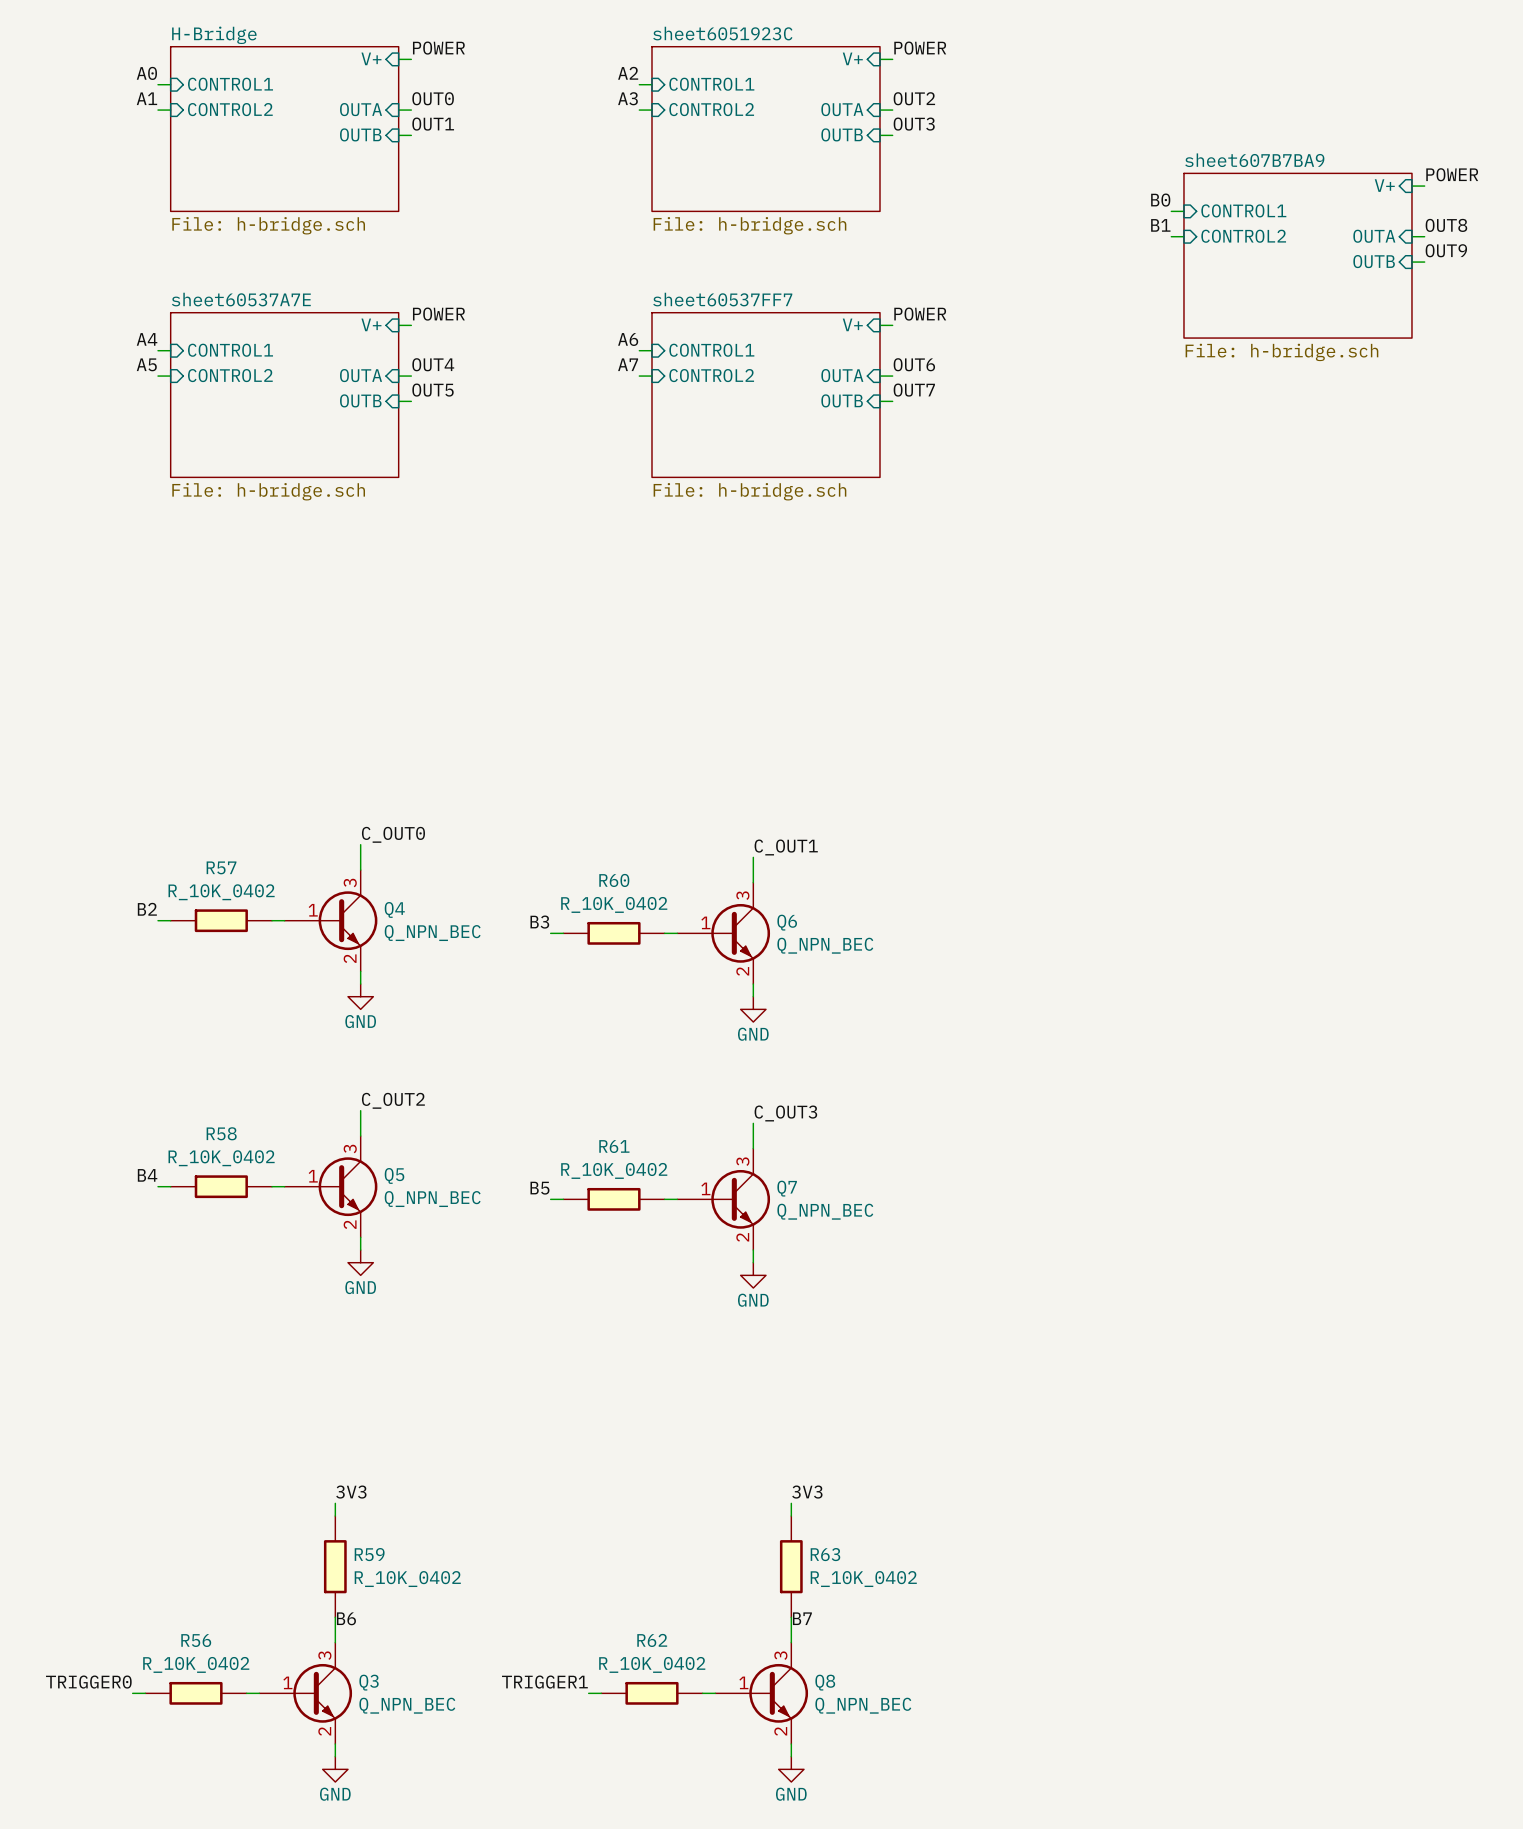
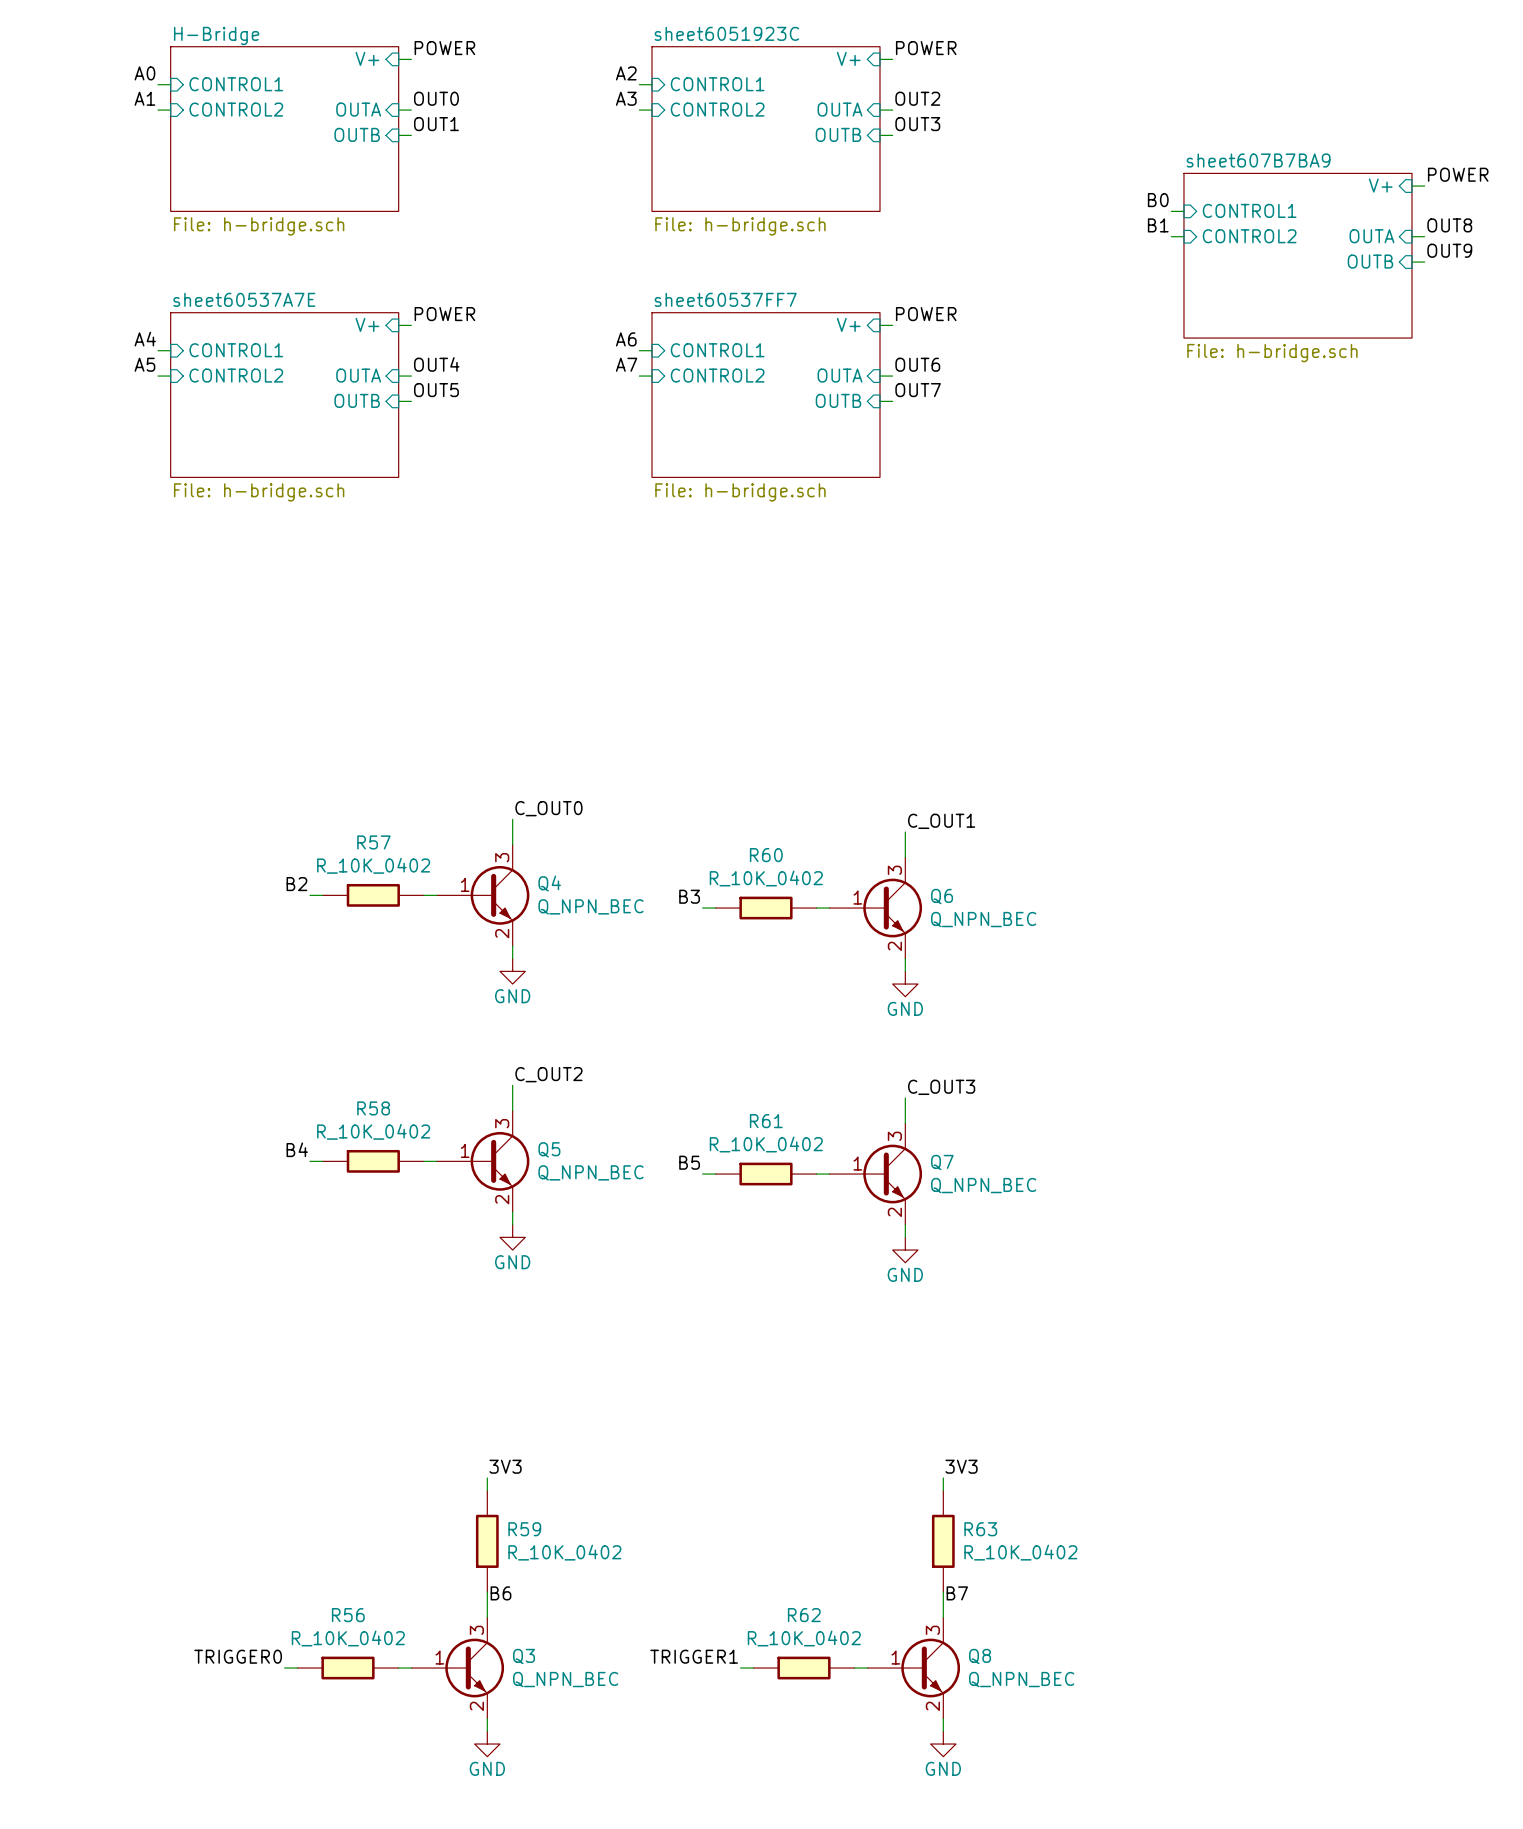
label position: C_OUT0 (393, 834) -> C_OUT0 (548, 808)
wire: (360, 844) (360, 870) -> (512, 819) (512, 844)
label position: C_OUT1 (786, 847) -> C_OUT1 (941, 821)
wire: (753, 857) (753, 882) -> (905, 832) (905, 857)
label position: B2 (147, 909) -> B2 (296, 884)
wire: (158, 920) (170, 920) -> (310, 895) (322, 895)
R57 position: (221, 920) -> (373, 895)
wire: (272, 920) (284, 920) -> (424, 895) (436, 895)
Q4 position: (331, 920) -> (483, 895)
label position: B3 (539, 922) -> B3 (689, 896)
wire: (550, 933) (563, 933) -> (702, 908) (715, 908)
R60 position: (613, 933) -> (765, 908)
wire: (664, 933) (677, 933) -> (816, 908) (829, 908)
Q6 position: (723, 933) -> (875, 908)
wire: (360, 971) (360, 984) -> (512, 946) (512, 958)
power symbol: none -> GND (512, 971)
wire: (753, 984) (753, 996) -> (905, 958) (905, 971)
power symbol: none -> GND (905, 984)
power symbol: GND (360, 996) -> none
power symbol: GND (753, 1009) -> none
label position: C_OUT2 (393, 1100) -> C_OUT2 (548, 1074)
wire: (360, 1110) (360, 1136) -> (512, 1085) (512, 1110)
label position: C_OUT3 (785, 1113) -> C_OUT3 (941, 1087)
wire: (753, 1123) (753, 1148) -> (905, 1098) (905, 1123)
label position: B4 (147, 1175) -> B4 (297, 1149)
wire: (158, 1186) (170, 1186) -> (310, 1161) (322, 1161)
R58 position: (221, 1186) -> (373, 1161)
wire: (272, 1186) (284, 1186) -> (424, 1161) (436, 1161)
Q5 position: (331, 1186) -> (483, 1161)
label position: B5 (539, 1188) -> B5 (689, 1162)
wire: (550, 1199) (563, 1199) -> (702, 1174) (715, 1174)
R61 position: (613, 1199) -> (765, 1174)
wire: (664, 1199) (677, 1199) -> (816, 1174) (829, 1174)
Q7 position: (723, 1199) -> (875, 1174)
wire: (360, 1237) (360, 1250) -> (512, 1212) (512, 1224)
power symbol: none -> GND (512, 1237)
wire: (753, 1250) (753, 1262) -> (905, 1224) (905, 1237)
power symbol: none -> GND (905, 1250)
power symbol: GND (360, 1262) -> none
power symbol: GND (753, 1275) -> none
label: none -> 3V3 (505, 1466)
label: none -> 3V3 (961, 1466)
label: 3V3 (351, 1492) -> none
label: 3V3 (807, 1492) -> none
wire: (335, 1503) (335, 1516) -> (487, 1478) (487, 1490)
wire: (791, 1503) (791, 1516) -> (943, 1478) (943, 1490)
R59 position: (335, 1566) -> (487, 1541)
R63 position: (791, 1566) -> (943, 1541)
wire: (335, 1617) (335, 1642) -> (487, 1592) (487, 1617)
wire: (791, 1617) (791, 1642) -> (943, 1592) (943, 1617)
label position: B6 (346, 1618) -> B6 (501, 1593)
label position: B7 (802, 1618) -> B7 (957, 1593)
label position: TRIGGER0 (88, 1682) -> TRIGGER0 (238, 1656)
label position: TRIGGER1 (544, 1682) -> TRIGGER1 (694, 1656)
wire: (132, 1693) (145, 1693) -> (284, 1668) (297, 1668)
R56 position: (196, 1693) -> (348, 1668)
wire: (246, 1693) (259, 1693) -> (398, 1668) (411, 1668)
Q3 position: (305, 1693) -> (457, 1668)
wire: (588, 1693) (601, 1693) -> (740, 1668) (753, 1668)
R62 position: (651, 1693) -> (803, 1668)
wire: (702, 1693) (715, 1693) -> (854, 1668) (867, 1668)
Q8 position: (761, 1693) -> (913, 1668)
wire: (335, 1744) (335, 1756) -> (487, 1718) (487, 1731)
power symbol: none -> GND (487, 1744)
wire: (791, 1744) (791, 1756) -> (943, 1718) (943, 1731)
power symbol: none -> GND (943, 1744)
power symbol: GND (335, 1769) -> none
power symbol: GND (791, 1769) -> none

